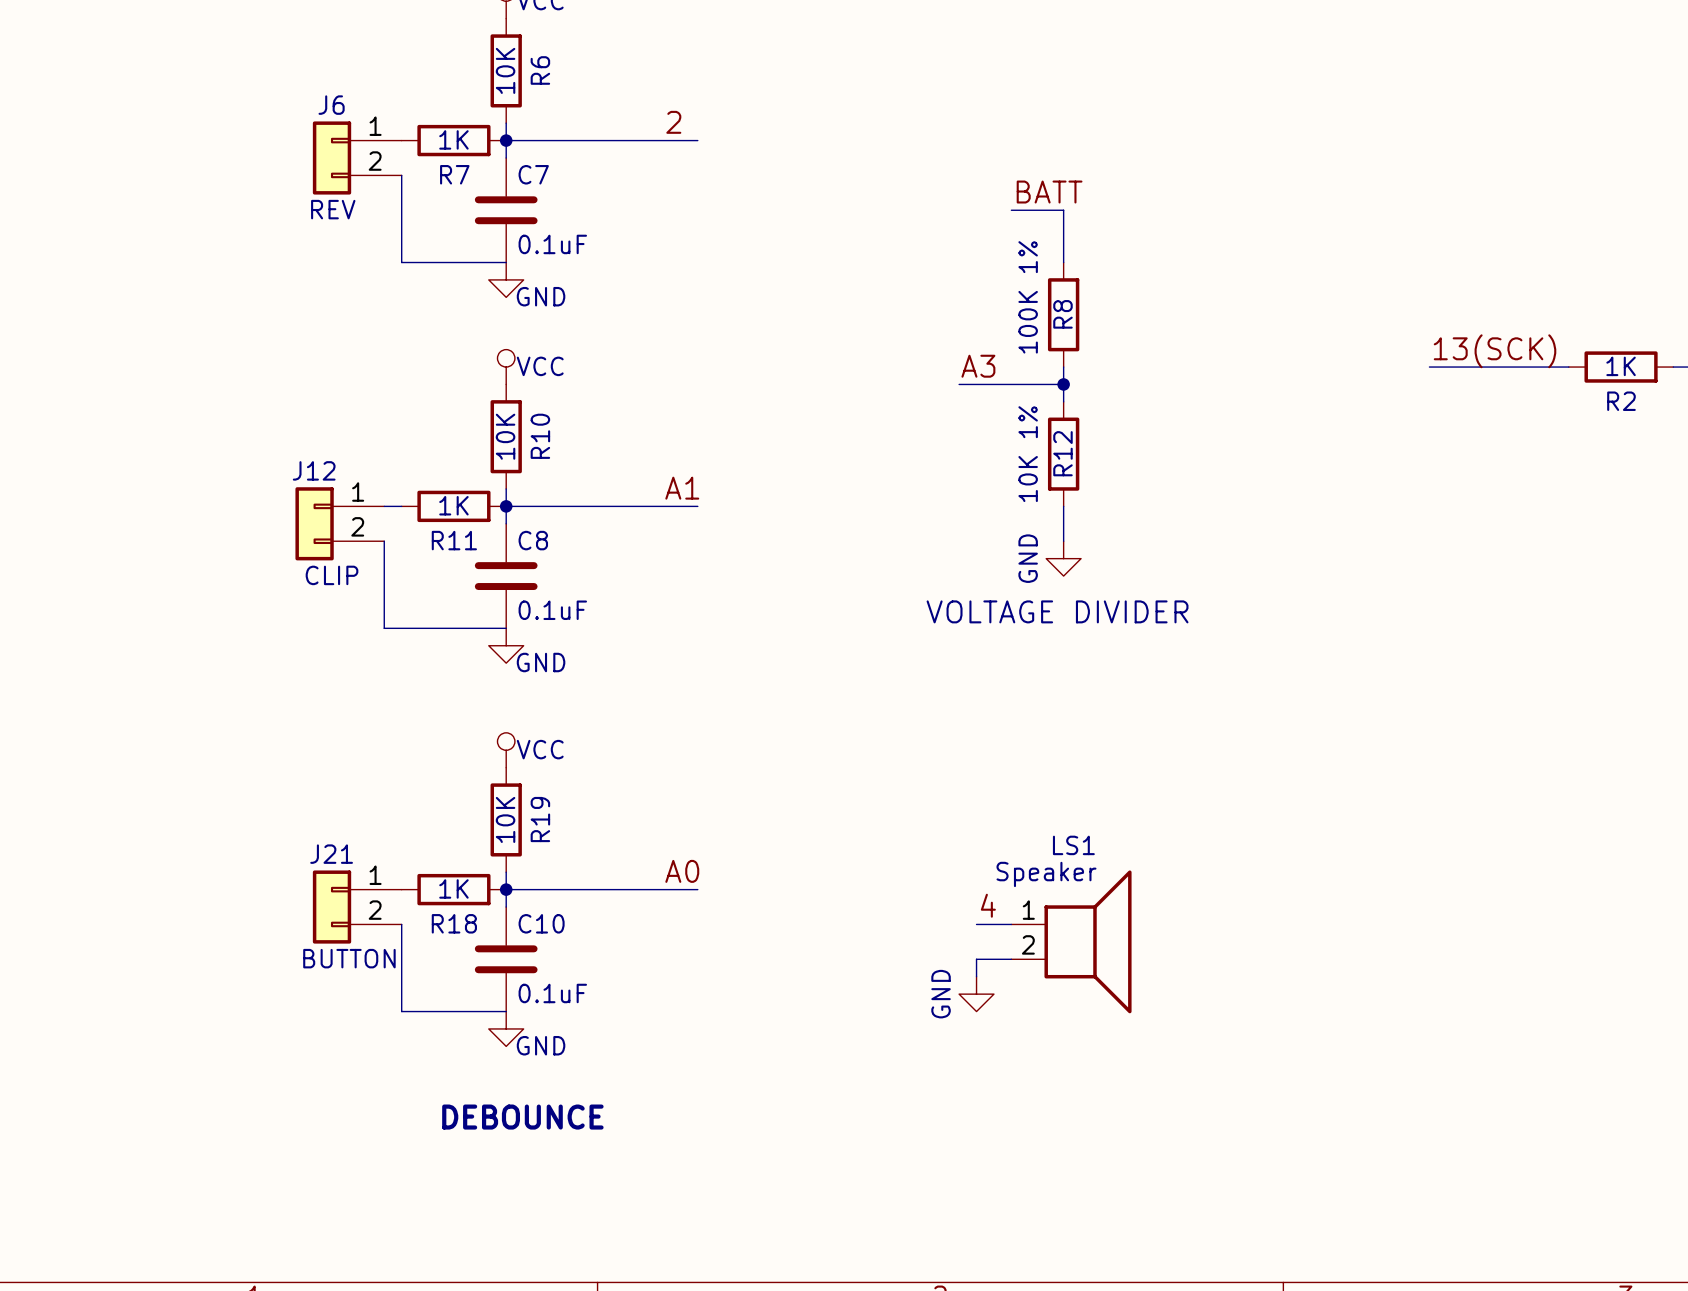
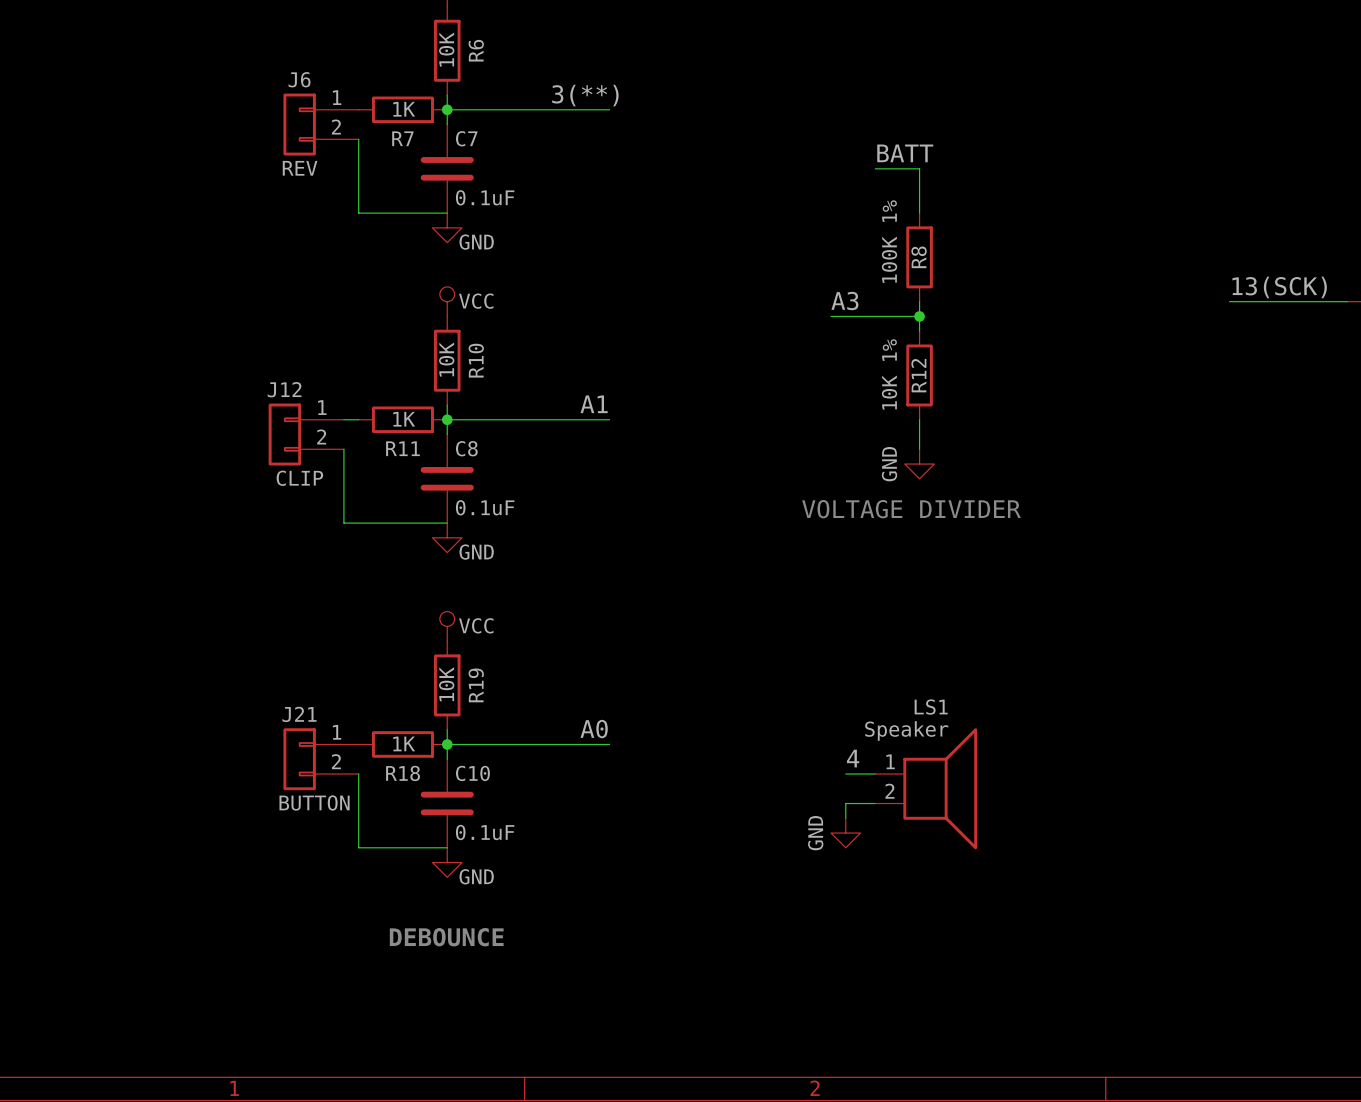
label: 2 (673, 122) -> none
label: none -> 3(**) (585, 95)

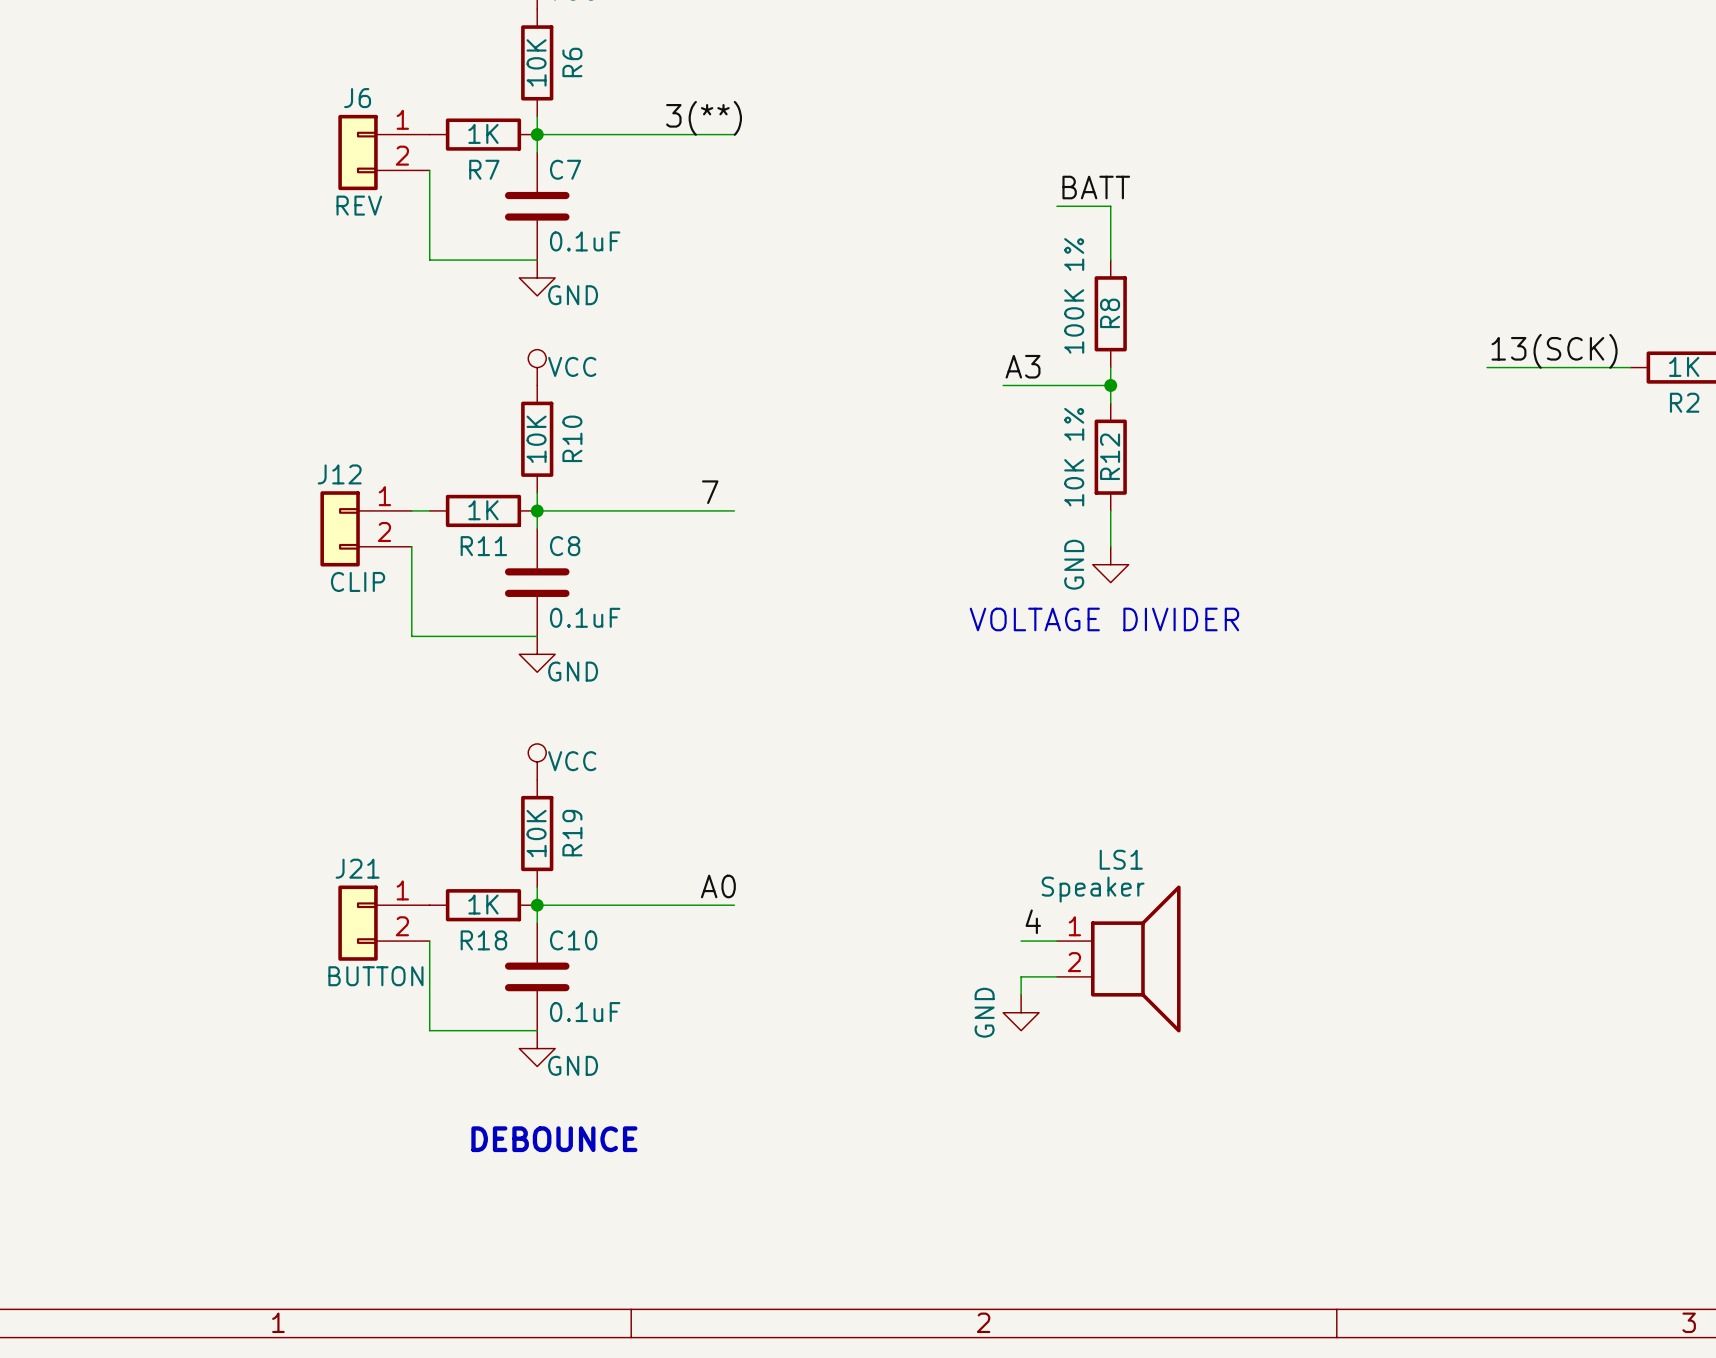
label: A1 (594, 404) -> 7 (710, 492)

